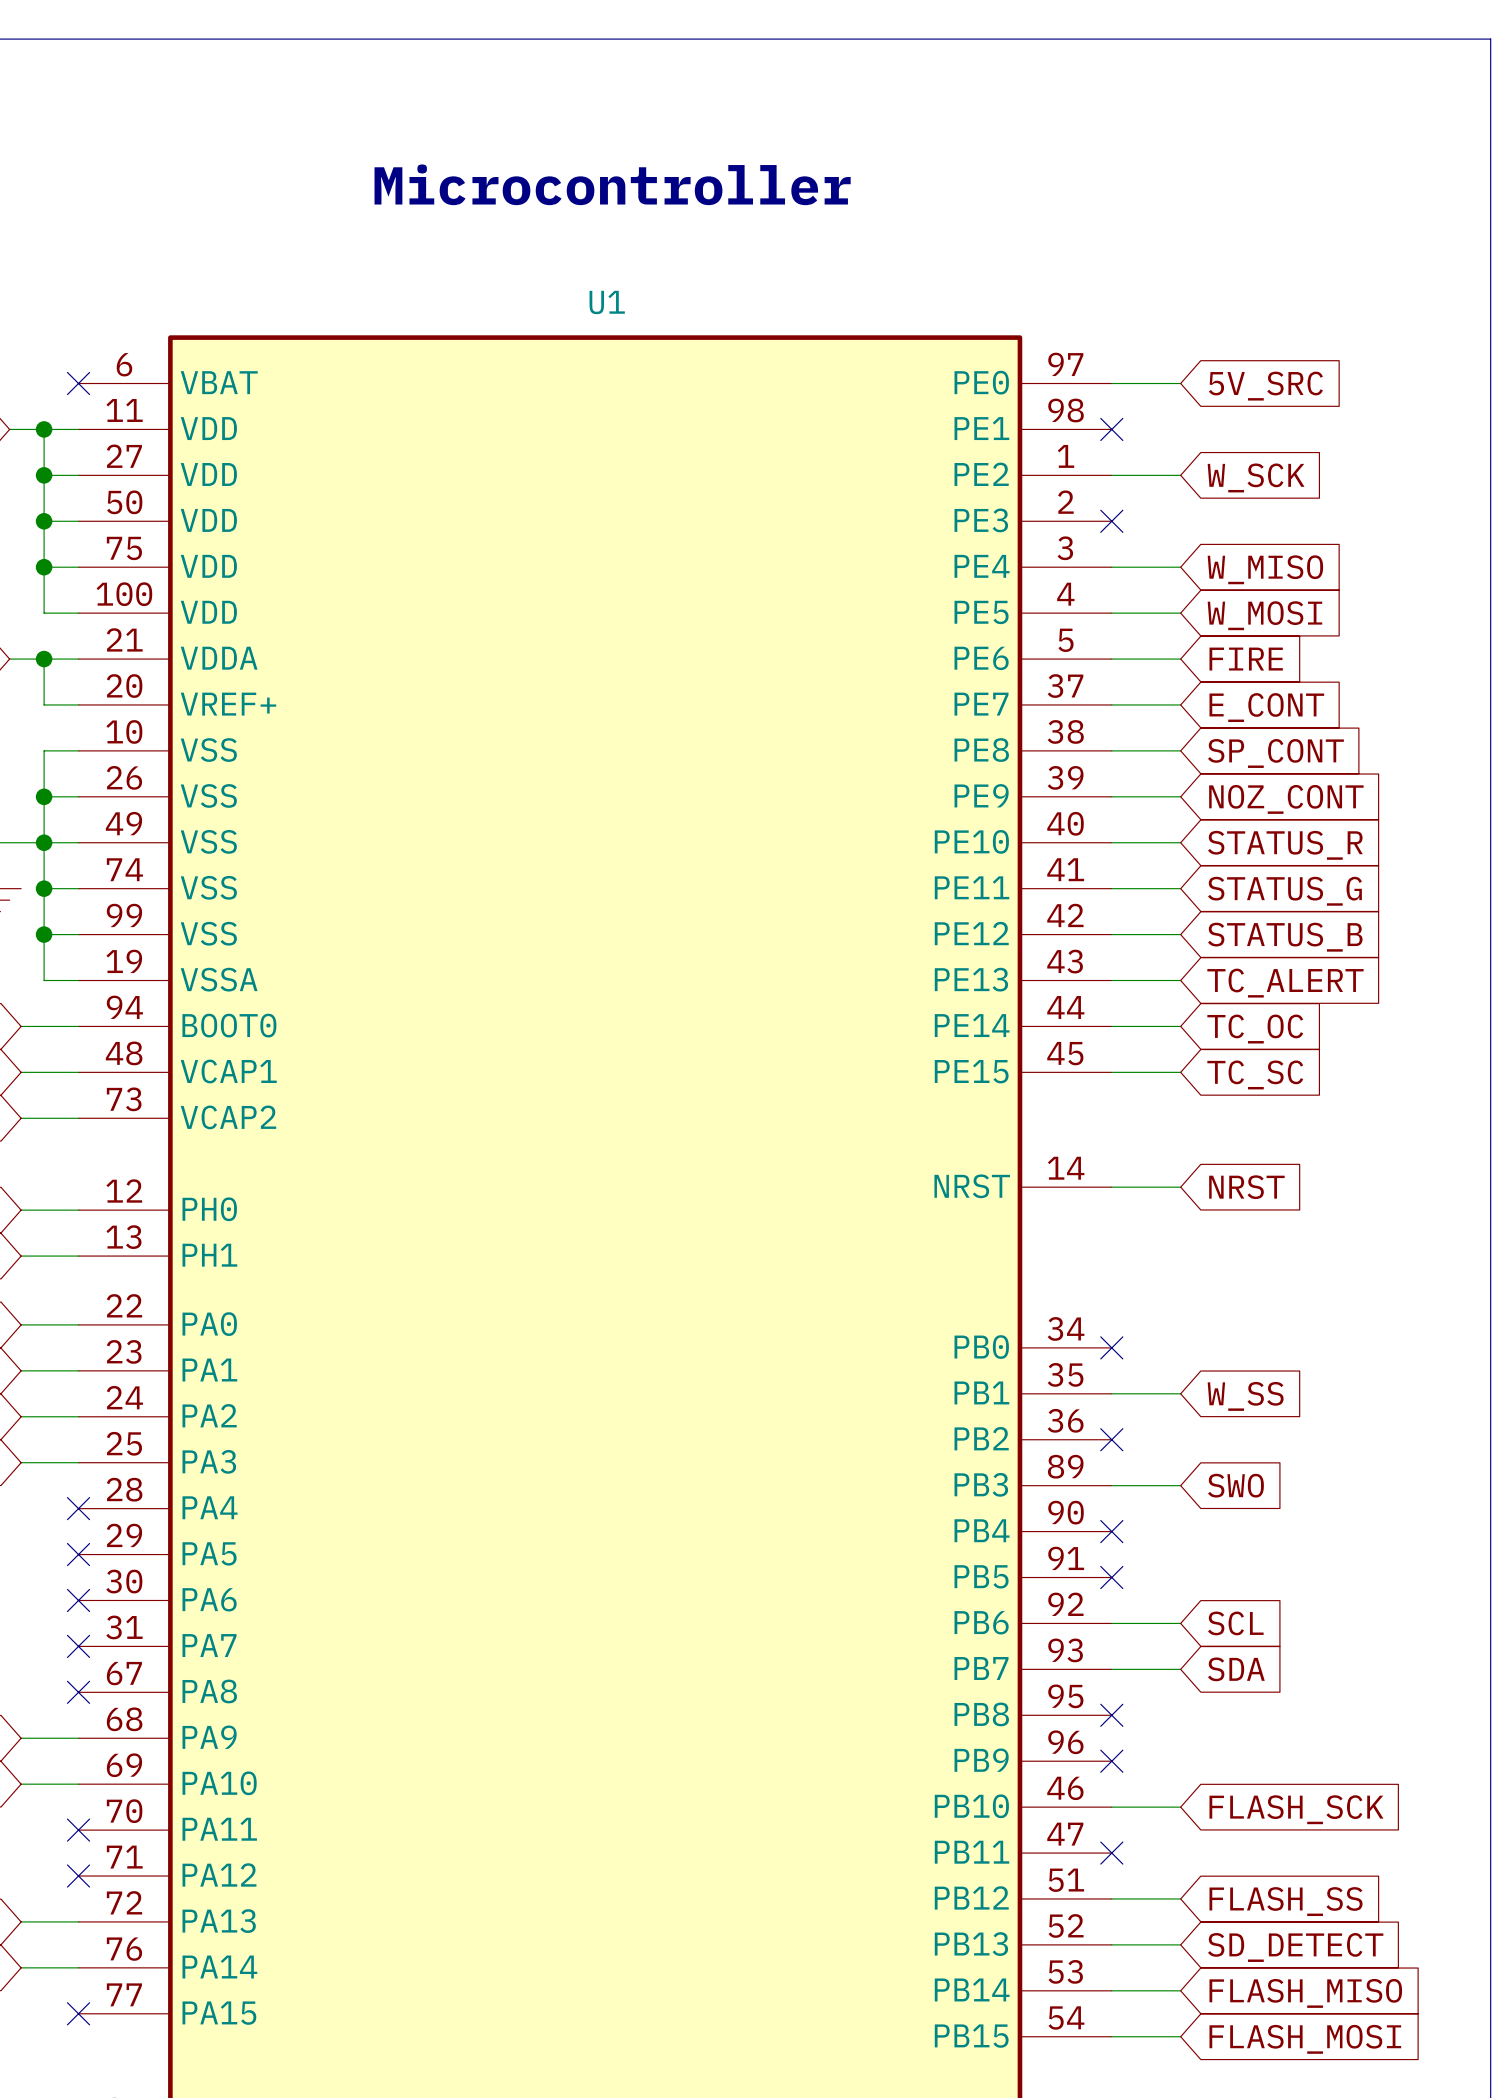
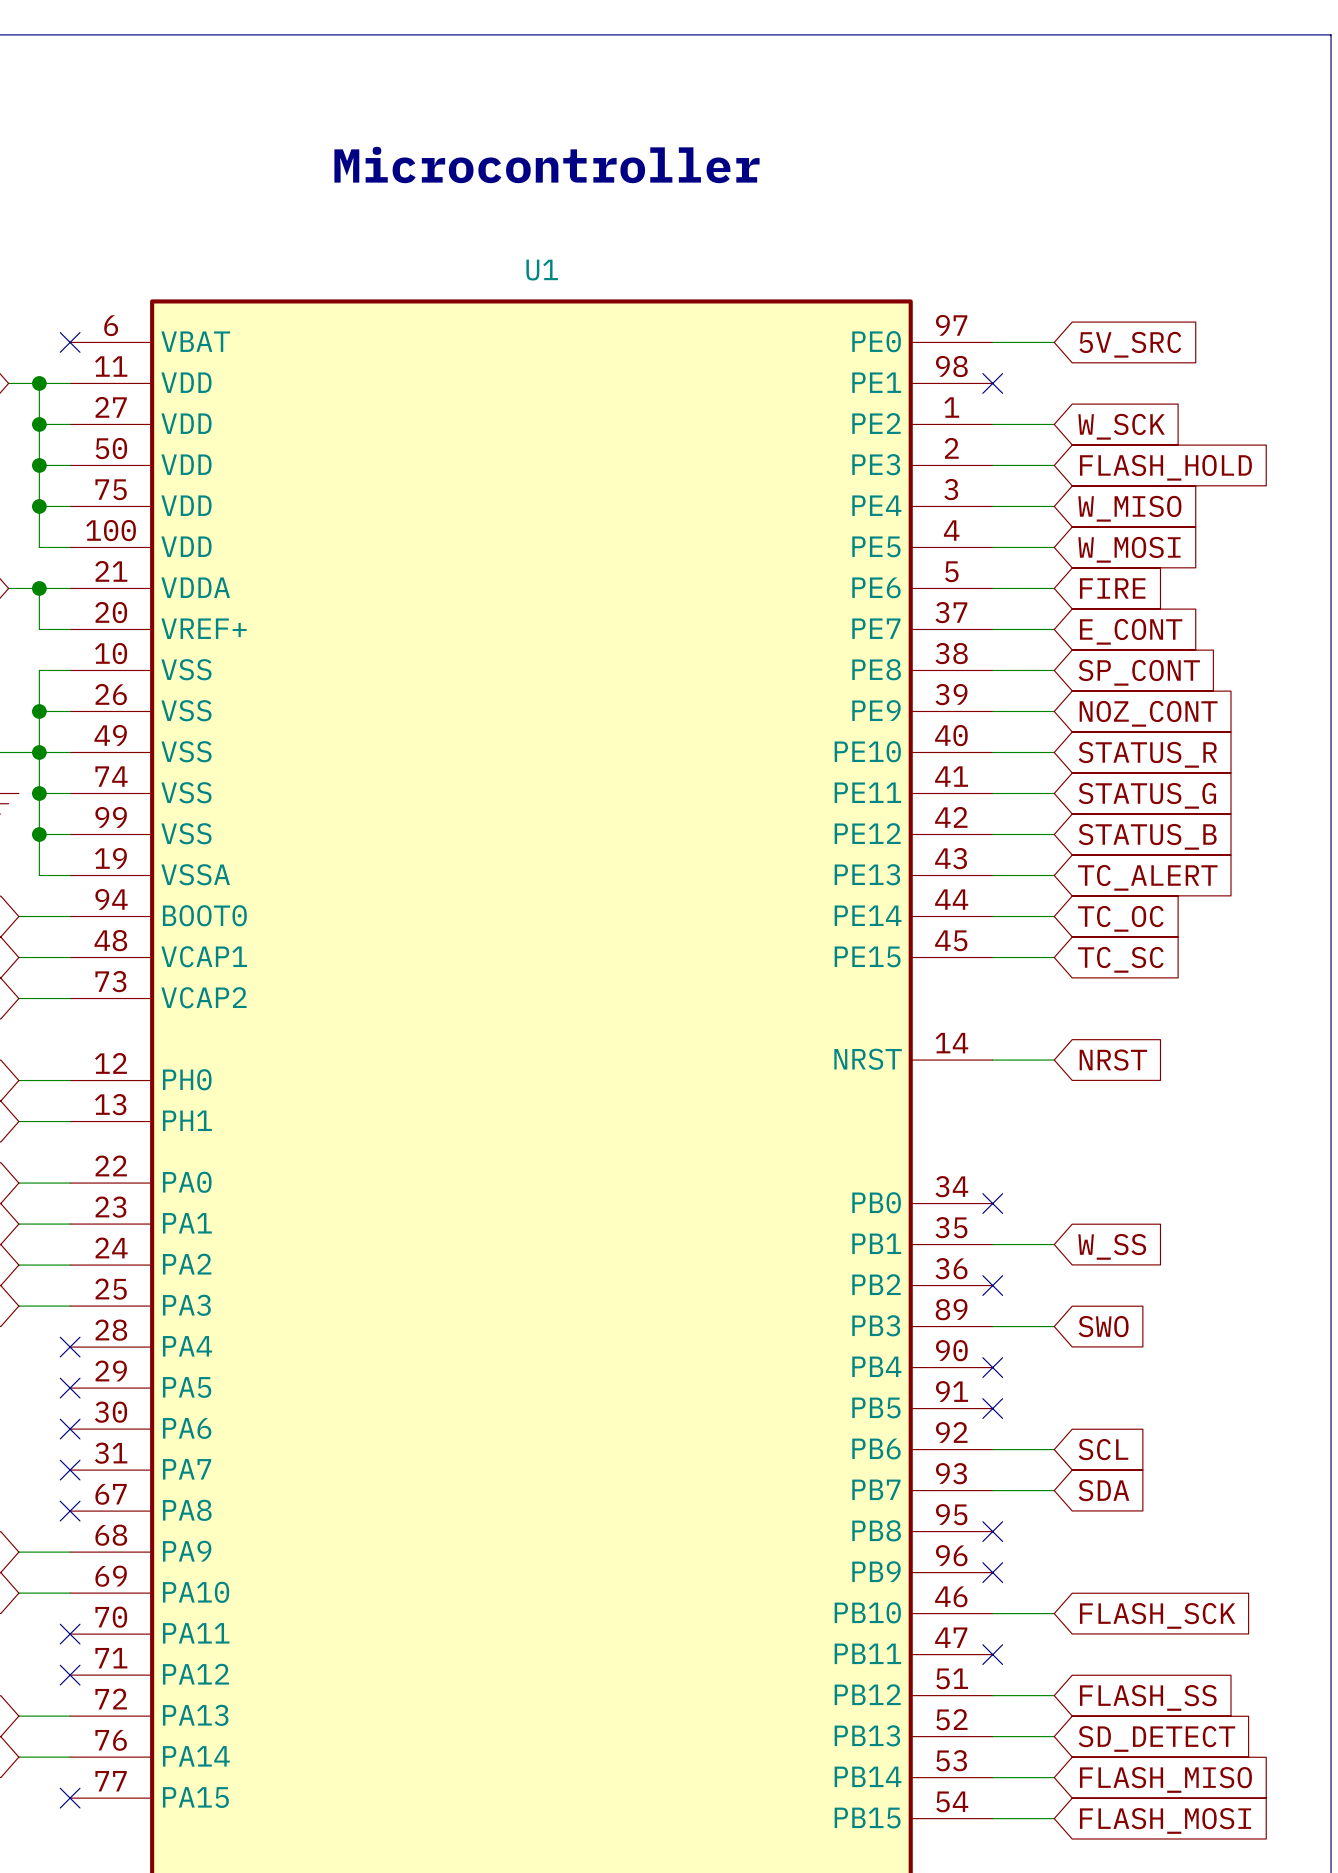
wire: none -> (992, 465) (1054, 465)
no-connect mark: (1111, 521) -> none
global label: none -> FLASH_HOLD (1165, 467)

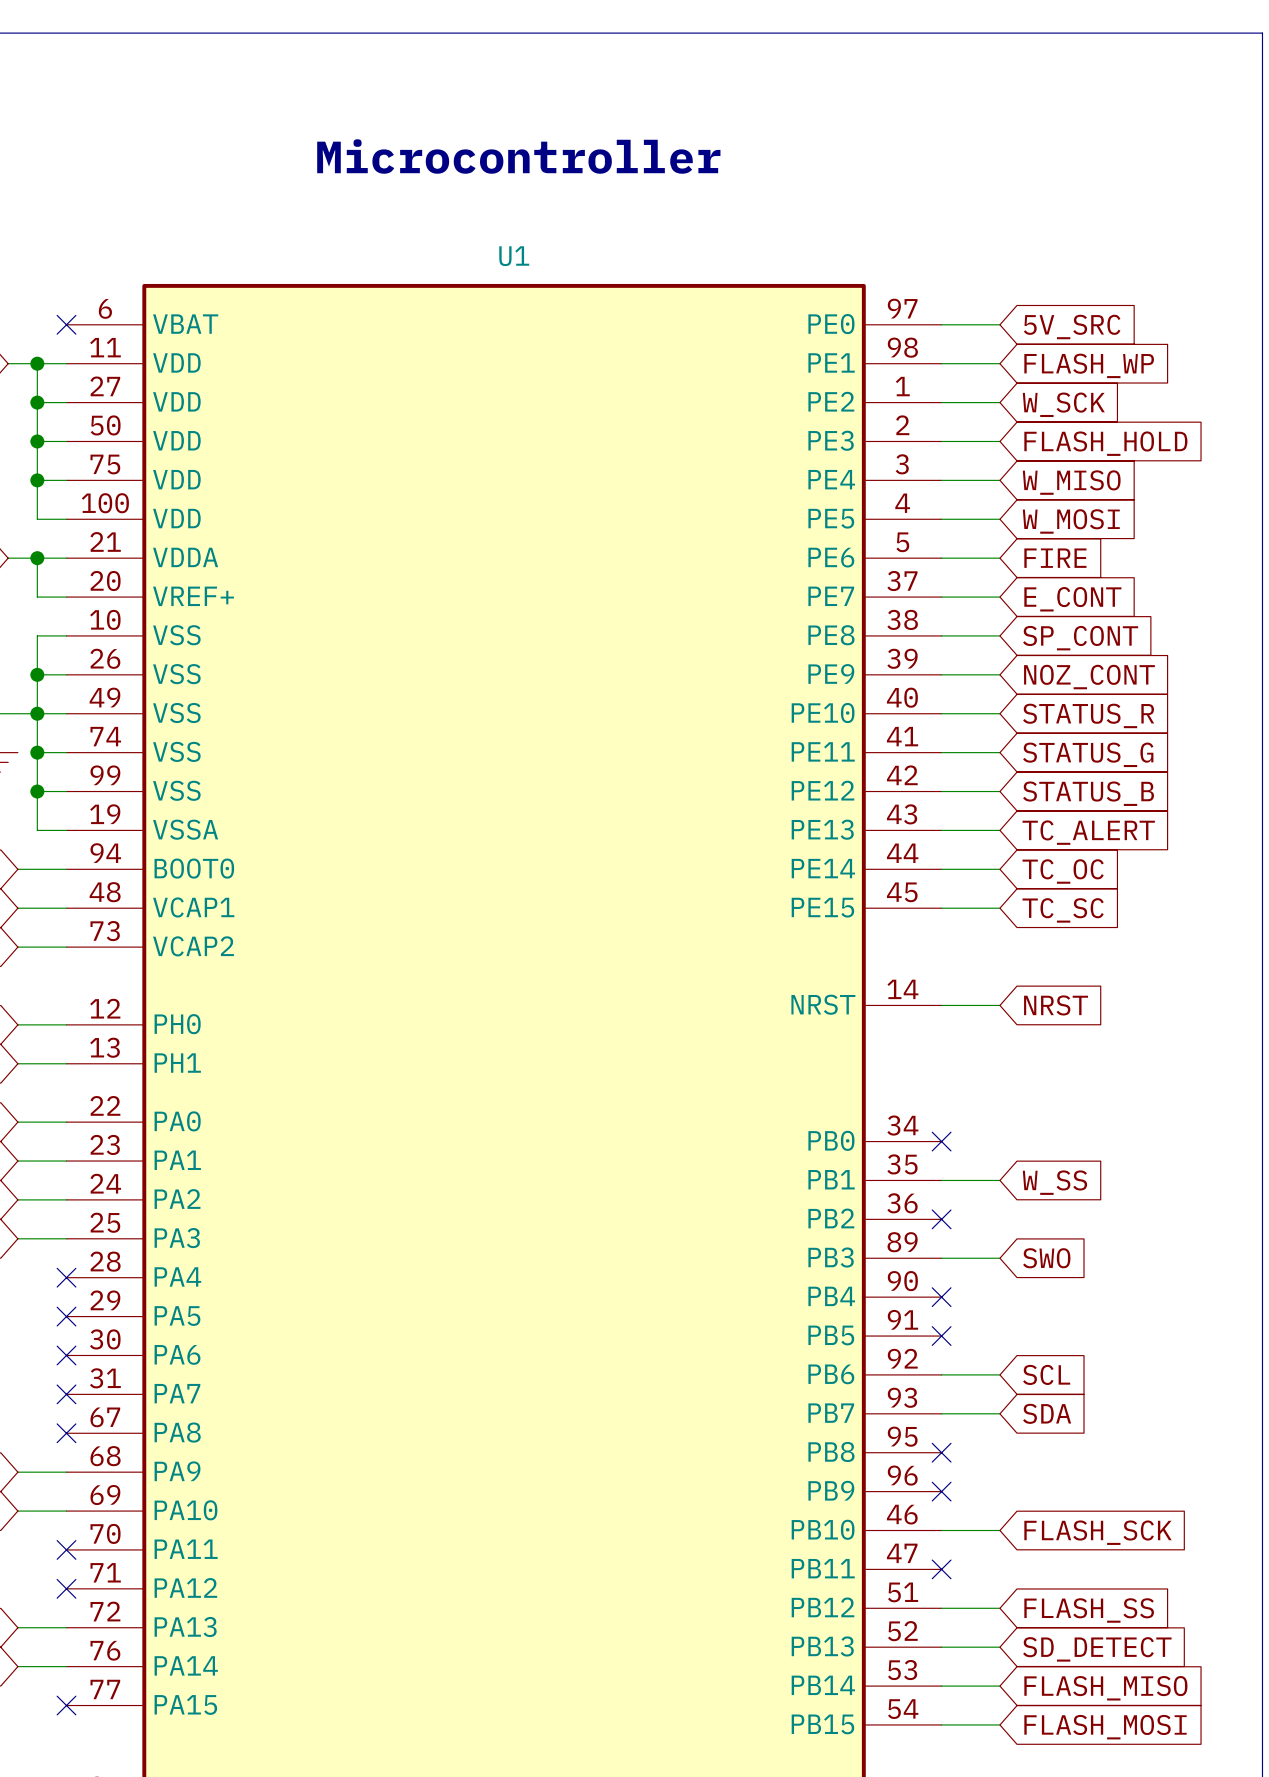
wire: none -> (941, 363) (999, 363)
no-connect mark: (992, 383) -> none
global label: none -> FLASH_WP (1089, 365)

